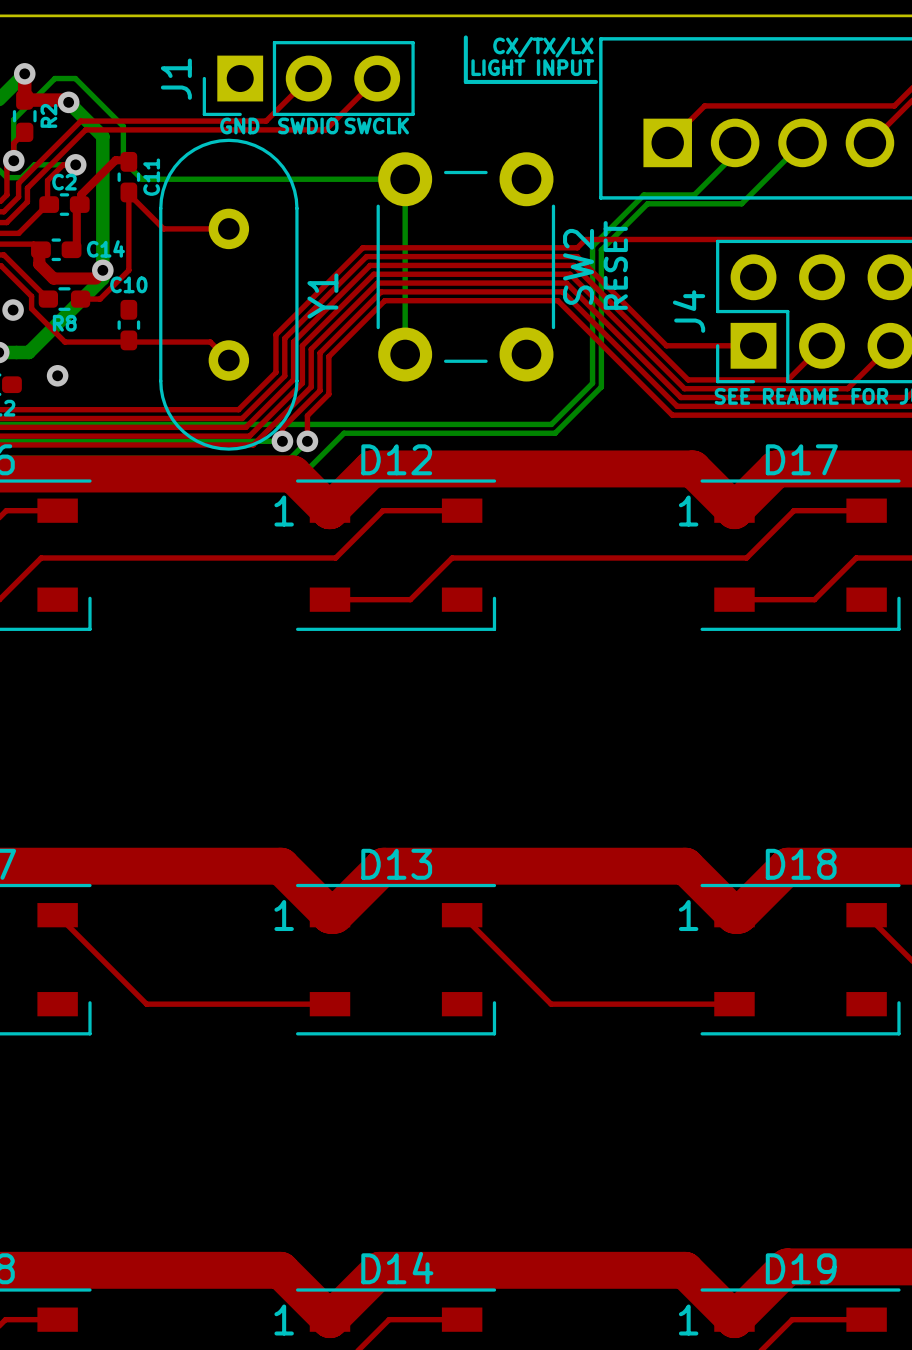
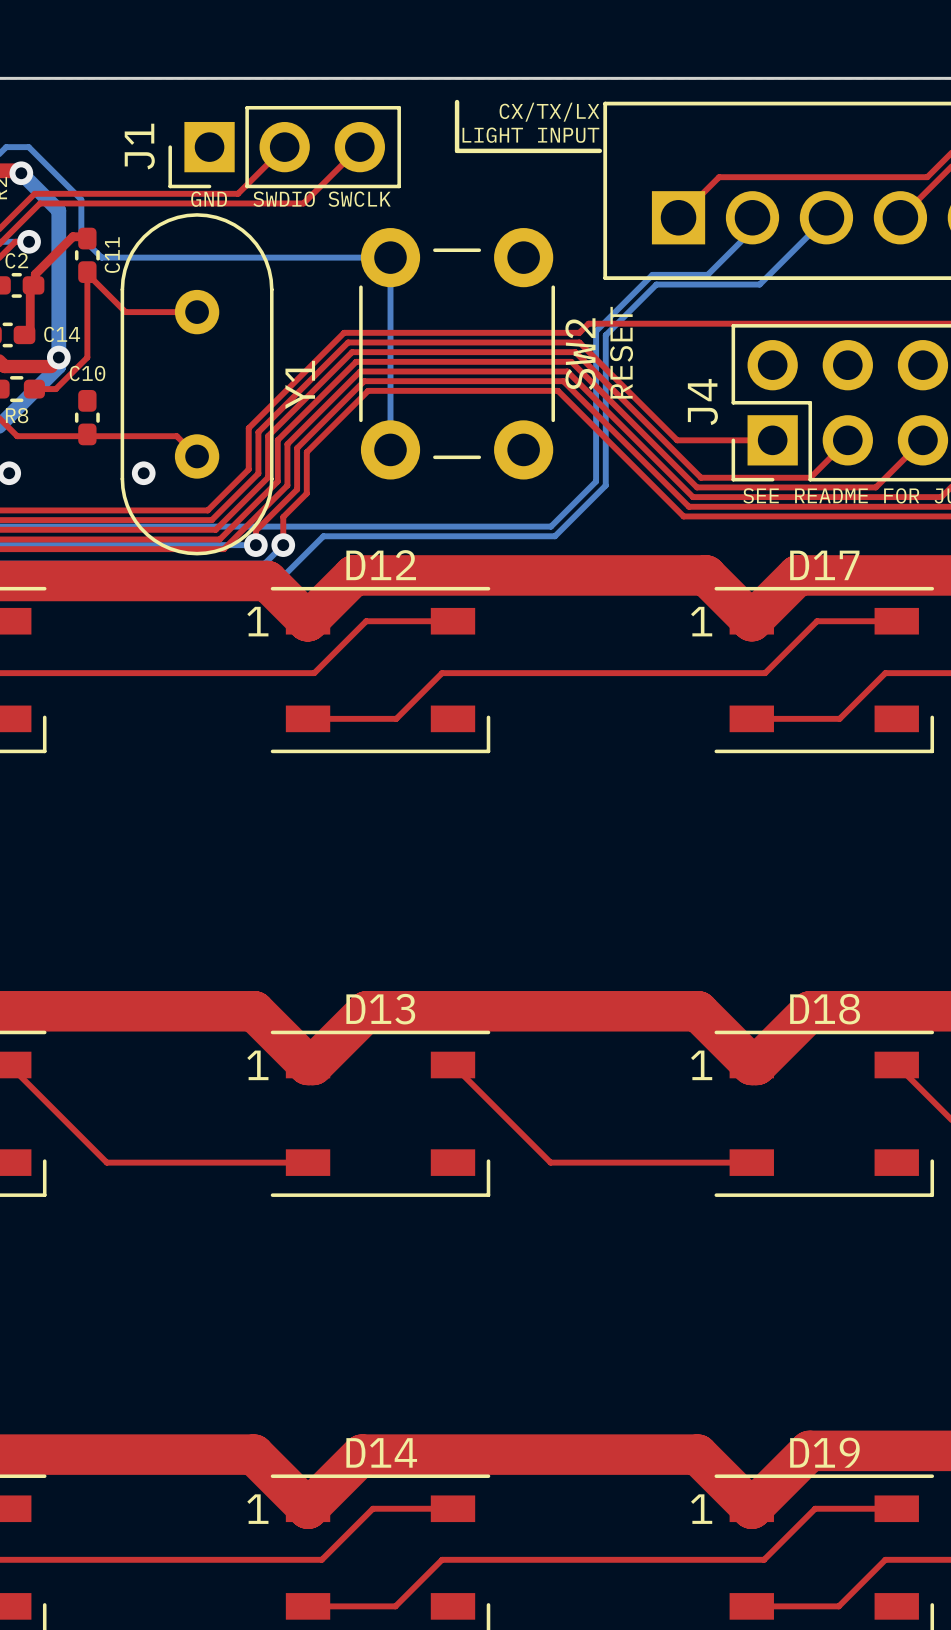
via: none -> (143, 473)

